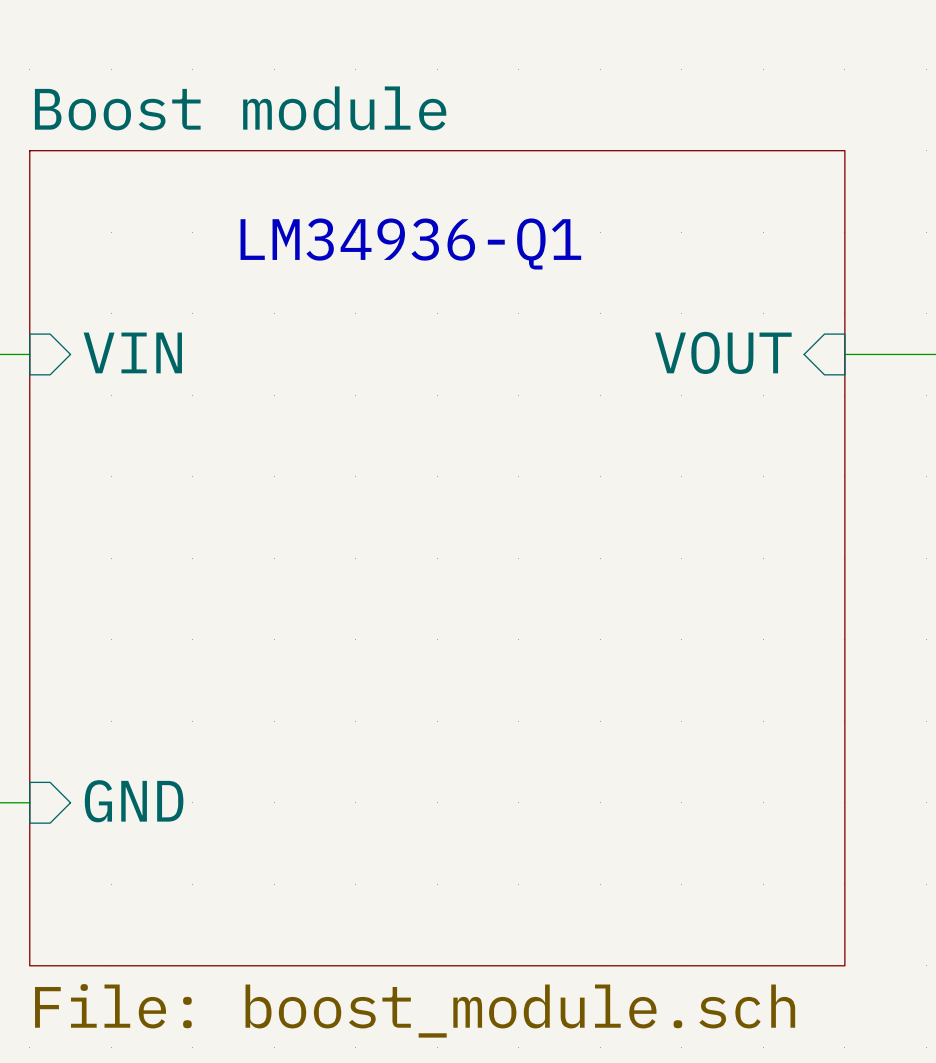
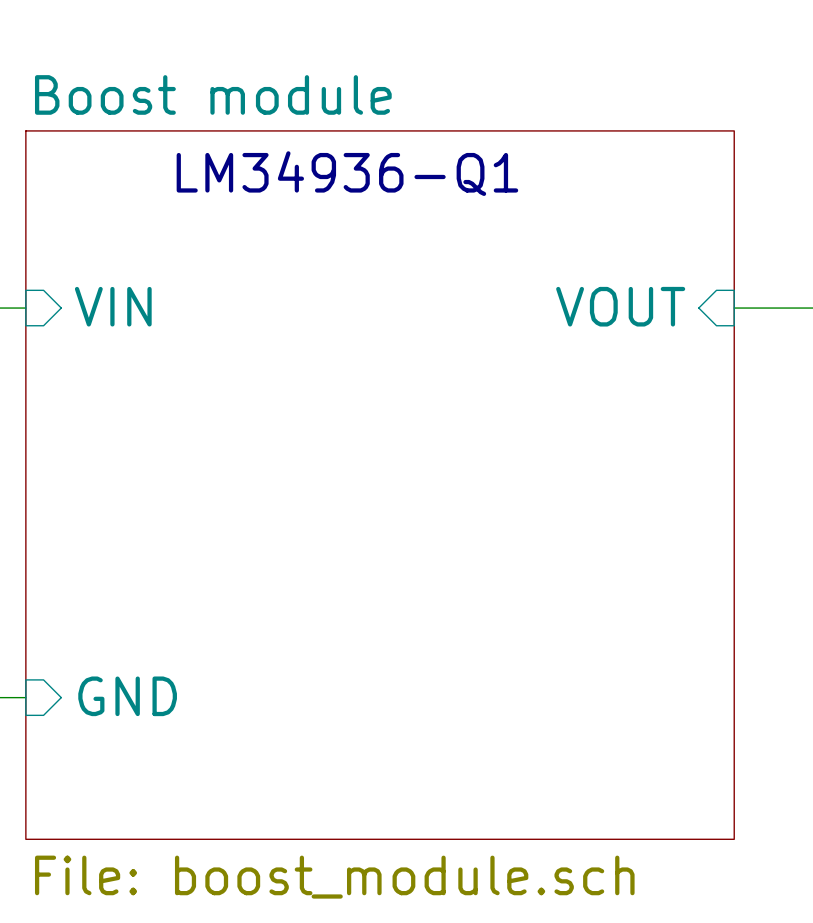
text position: LM34936-Q1 (410, 243) -> LM34936-Q1 (347, 173)

